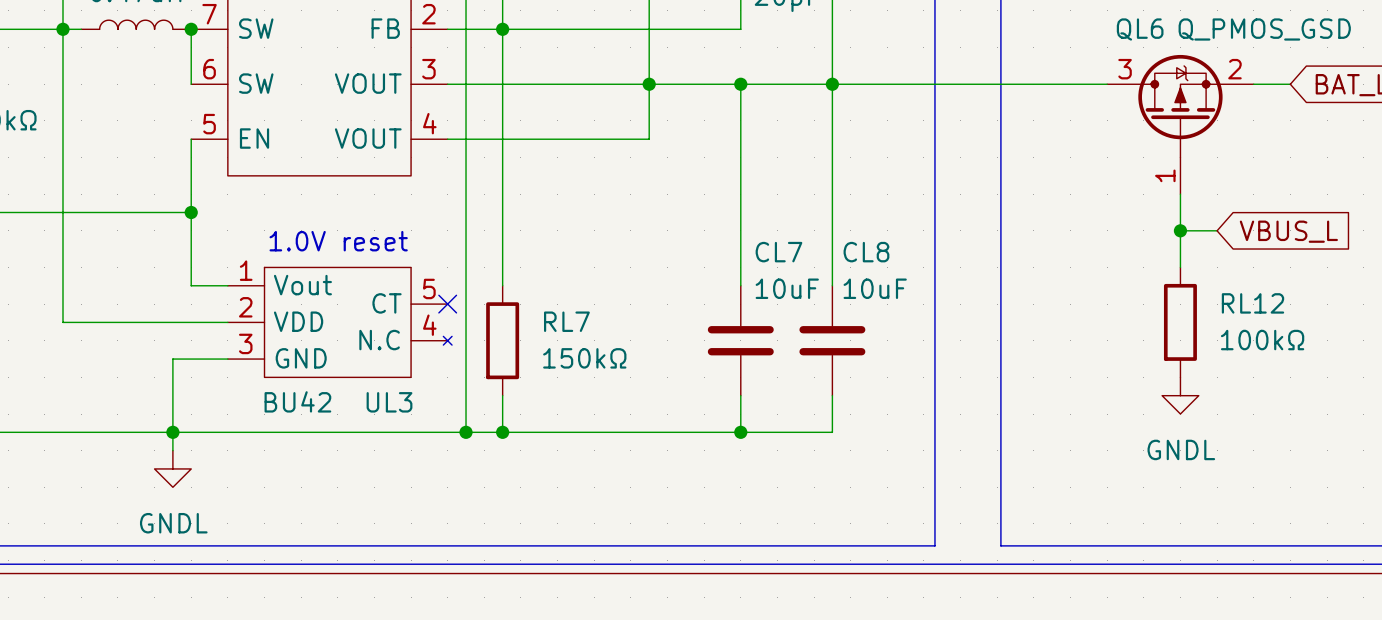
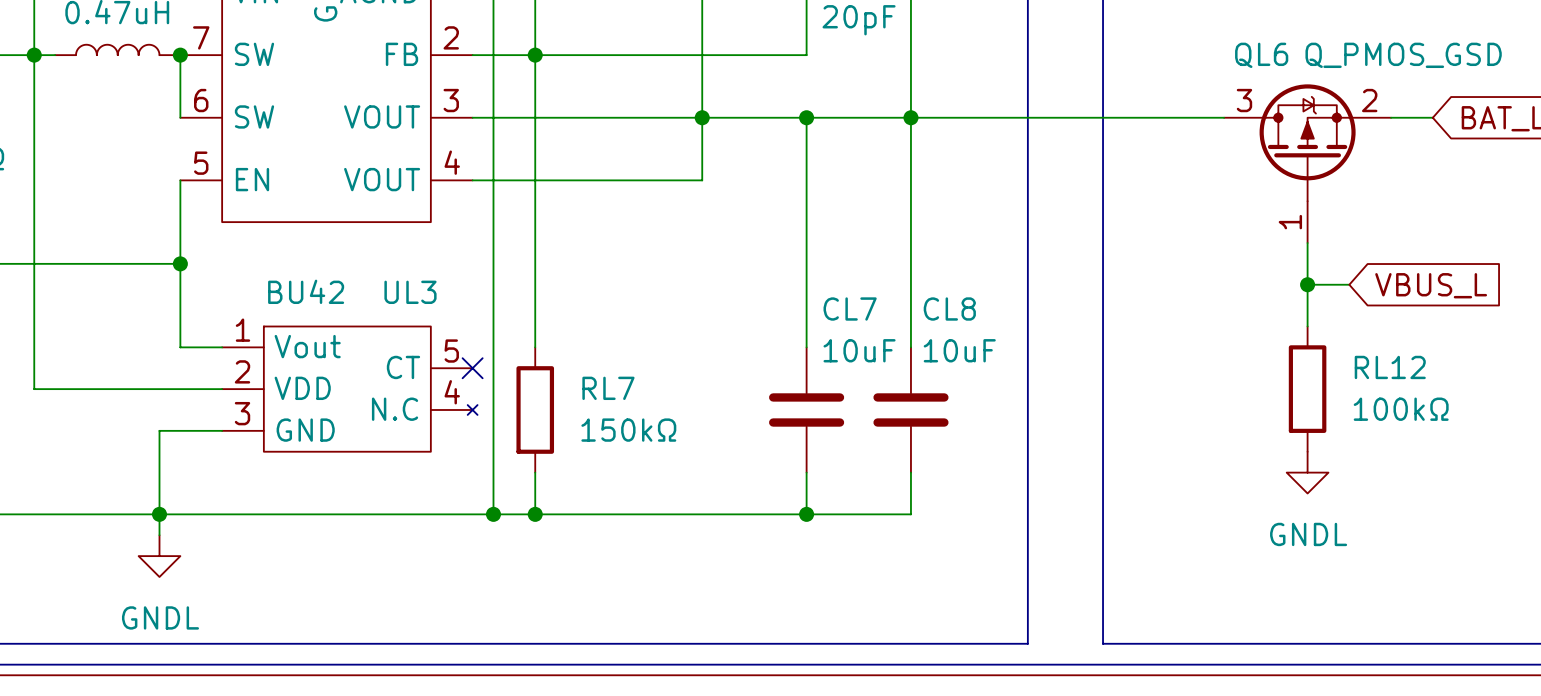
text: 1.0V reset (338, 241) -> none
UL3 value position: BU42 (297, 401) -> BU42 (306, 291)
UL3 name position: UL3 (389, 402) -> UL3 (410, 292)

